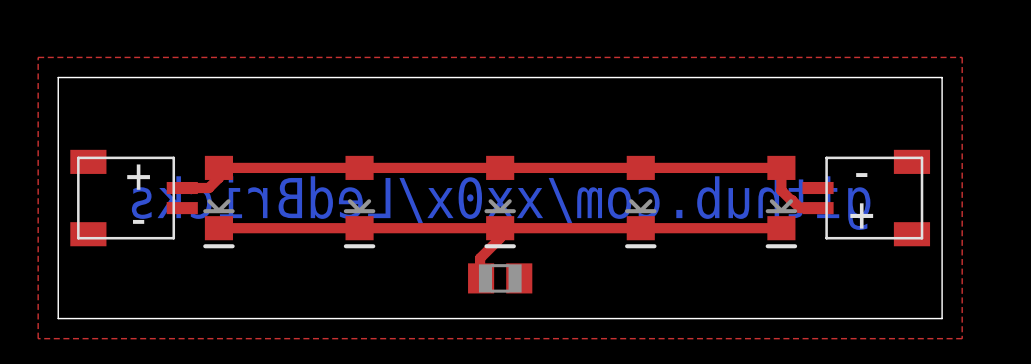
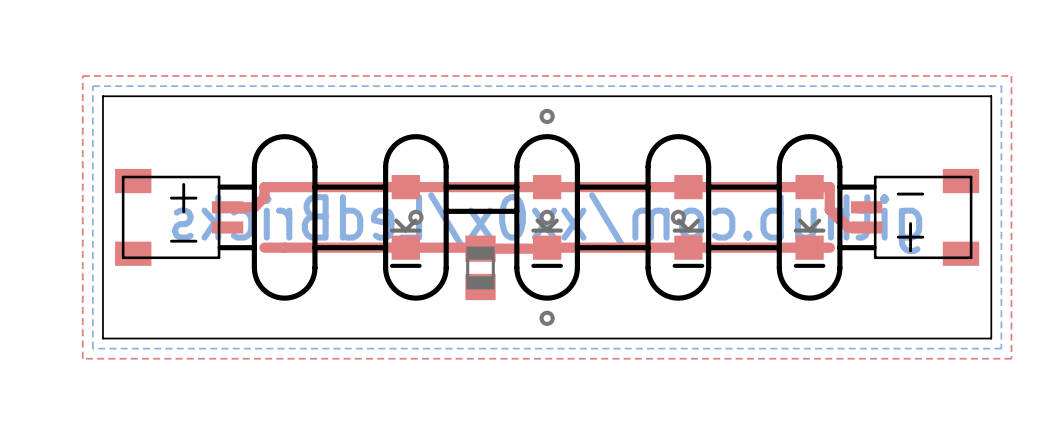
bottom zone outline: none -> (92, 86) (1001, 86) (1001, 348) (92, 348) (92, 86)
via: none -> (547, 116)
line: none -> (254, 166) (255, 275) (260, 286) (269, 294) (280, 297) (292, 297) (306, 289) (312, 279) (314, 271) (313, 159) (308, 148) (299, 140) (288, 136) (280, 136) (273, 138) (263, 145) (256, 155) (254, 166)
line: none -> (385, 166) (386, 275) (391, 286) (400, 294) (411, 297) (423, 297) (437, 289) (443, 279) (445, 271) (445, 159) (439, 148) (431, 140) (419, 136) (411, 136) (404, 138) (394, 145) (387, 155) (385, 166)
line: none -> (516, 166) (517, 275) (523, 286) (531, 294) (543, 297) (554, 297) (568, 289) (575, 279) (577, 271) (576, 159) (571, 148) (562, 140) (551, 136) (543, 136) (535, 138) (525, 145) (519, 155) (516, 166)
line: none -> (648, 166) (649, 275) (654, 286) (663, 294) (674, 297) (686, 297) (699, 289) (706, 279) (708, 271) (707, 159) (702, 148) (693, 140) (682, 136) (674, 136) (666, 138) (656, 145) (650, 155) (648, 166)
line: none -> (779, 166) (780, 275) (785, 286) (794, 294) (805, 297) (817, 297) (831, 289) (837, 279) (839, 271) (838, 159) (833, 148) (824, 140) (813, 136) (805, 136) (798, 138) (788, 145) (781, 155) (779, 166)
line: none -> (220, 187) (254, 187)
line: none -> (314, 187) (385, 187)
line: none -> (446, 187) (516, 187)
line: none -> (577, 187) (648, 187)
line: none -> (708, 187) (779, 187)
line: none -> (839, 187) (874, 187)
line: none -> (446, 211) (516, 211)
via: none -> (415, 217)
via: none -> (547, 217)
via: none -> (678, 217)
part: (218, 202) -> none
part position: (781, 202) -> (809, 221)
line: none -> (220, 247) (254, 247)
line: none -> (314, 247) (385, 247)
top track: (432, 228) (500, 228) (500, 238) (480, 258) (481, 278) -> (479, 247) (547, 247)
line: none -> (577, 247) (648, 247)
line: none -> (708, 247) (779, 247)
line: none -> (839, 247) (874, 247)
part rotation: 0° (500, 278) -> 90° clockwise (480, 267)
part position: (500, 278) -> (480, 267)
via: none -> (547, 318)

